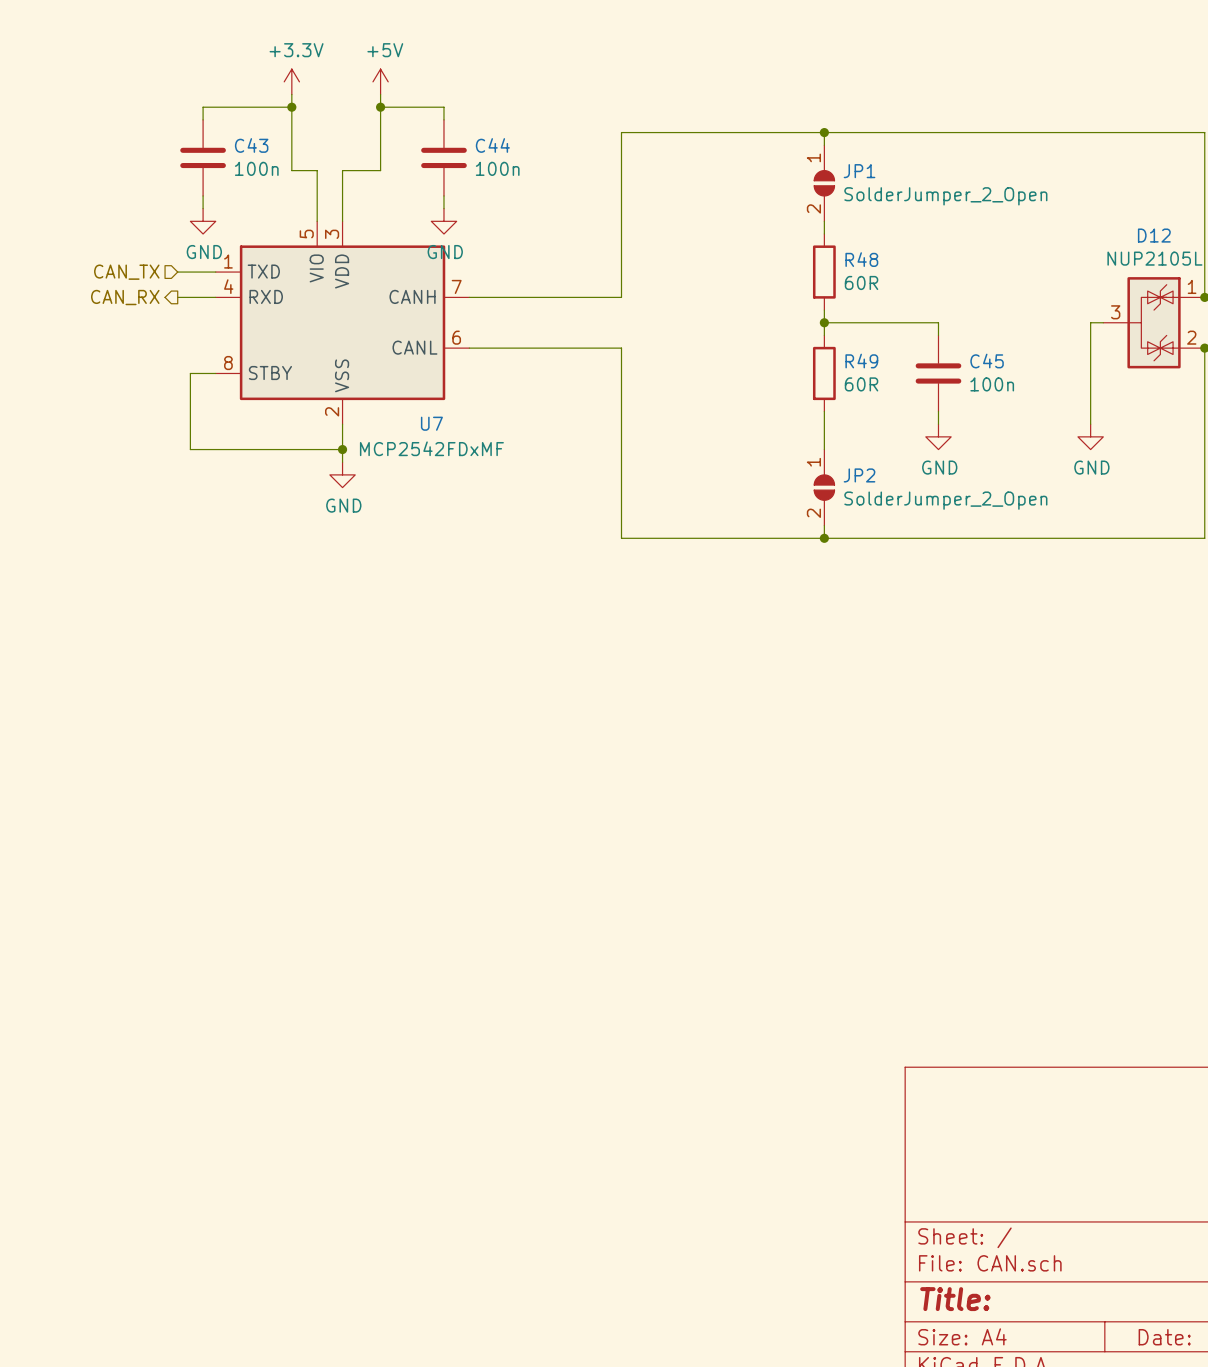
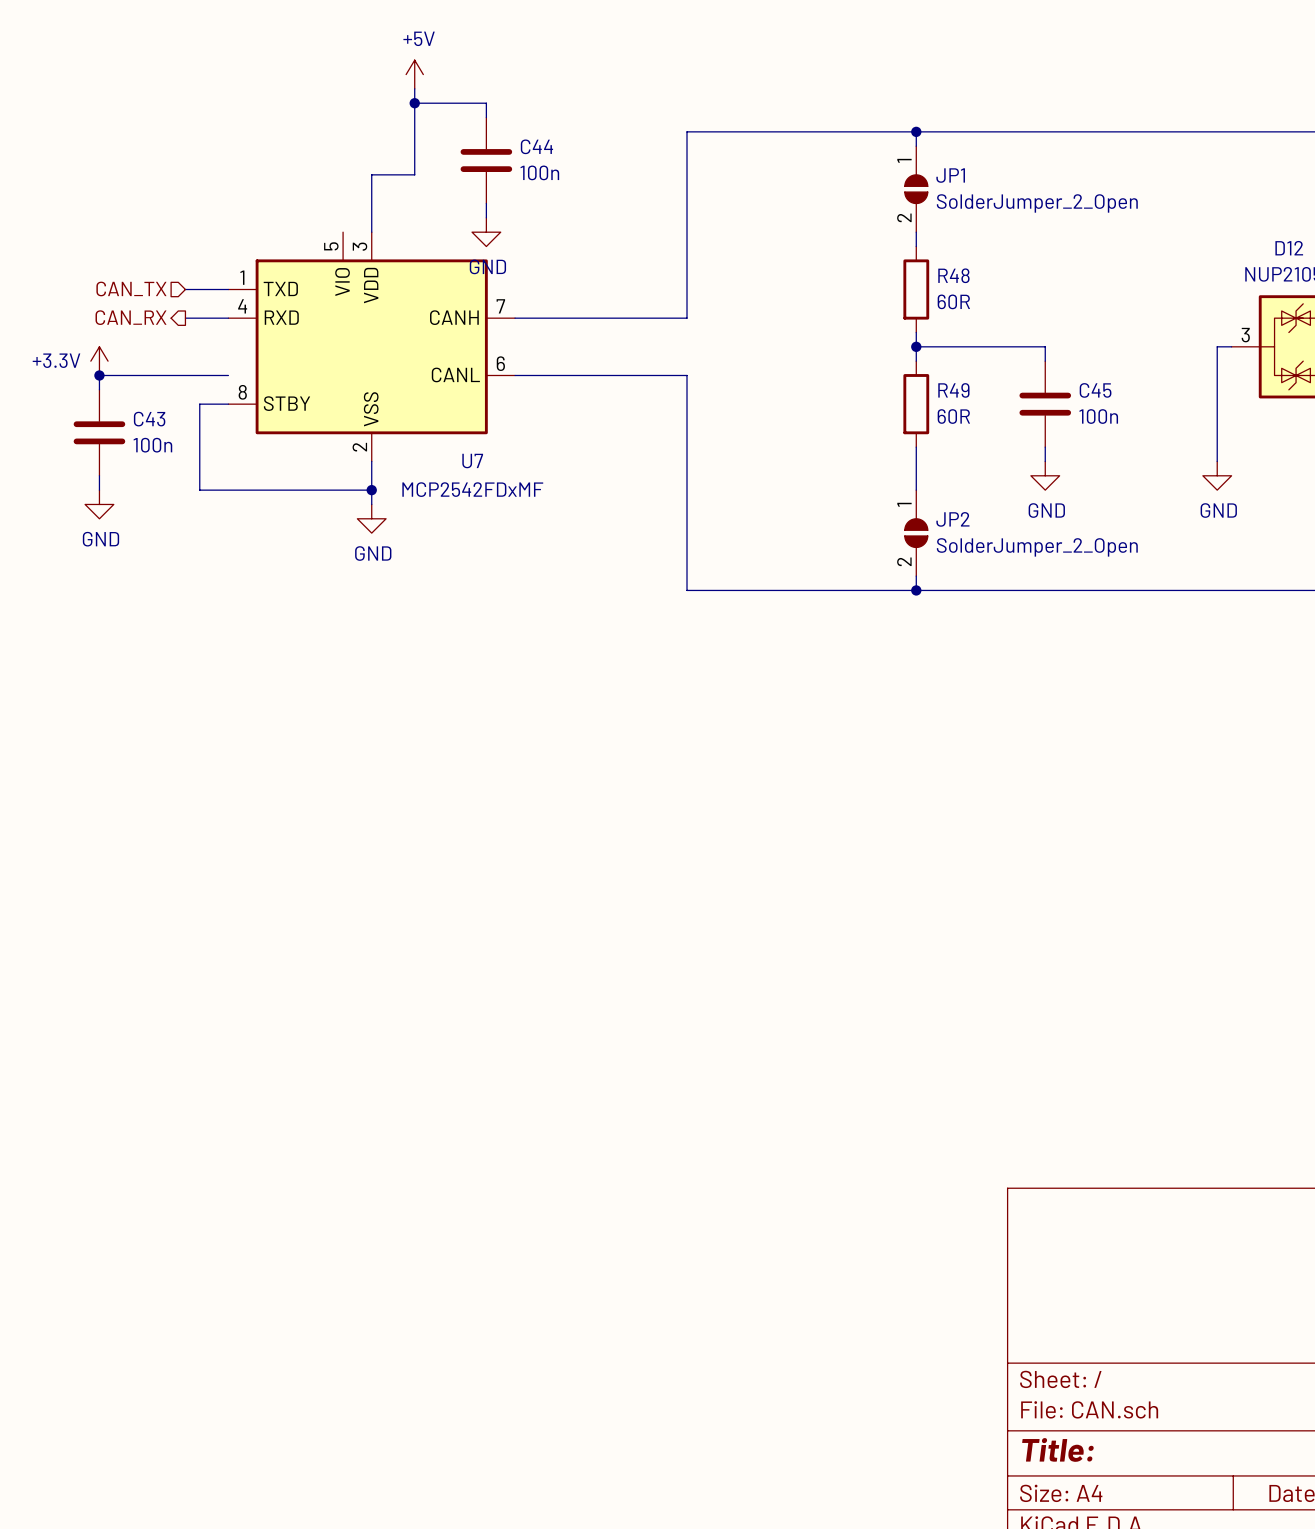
power symbol: +3.3V (291, 81) -> none
wire: (291, 94) (291, 170) (317, 170) (317, 221) -> none
wire: (291, 107) (203, 107) (203, 119) -> none
junction: (291, 107) -> none
C43 position: (203, 157) -> (99, 432)
wire: (203, 195) (203, 208) -> none
power symbol: GND (203, 221) -> none
power symbol: none -> +3.3V (99, 361)
junction: none -> (99, 375)
wire: none -> (228, 375) (99, 375) (99, 389)
wire: none -> (99, 475) (99, 490)
power symbol: none -> GND (99, 504)

